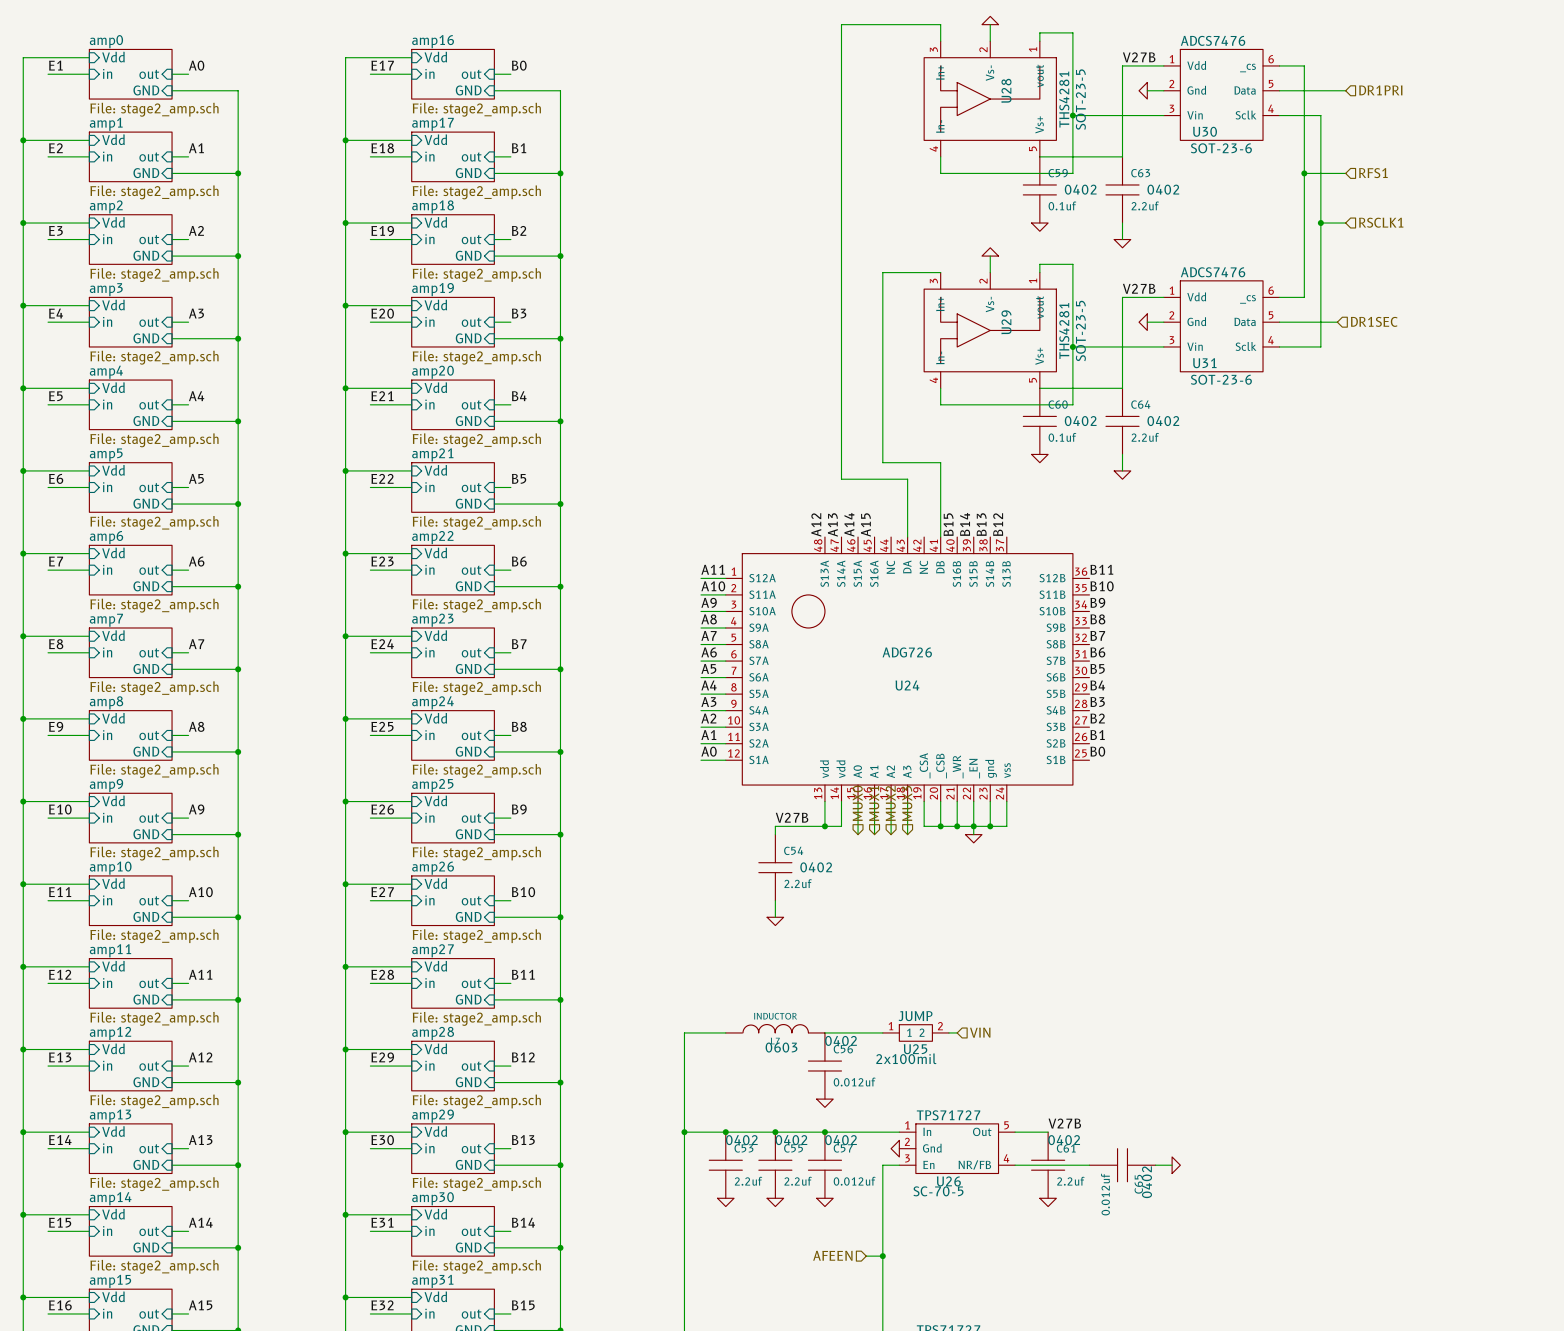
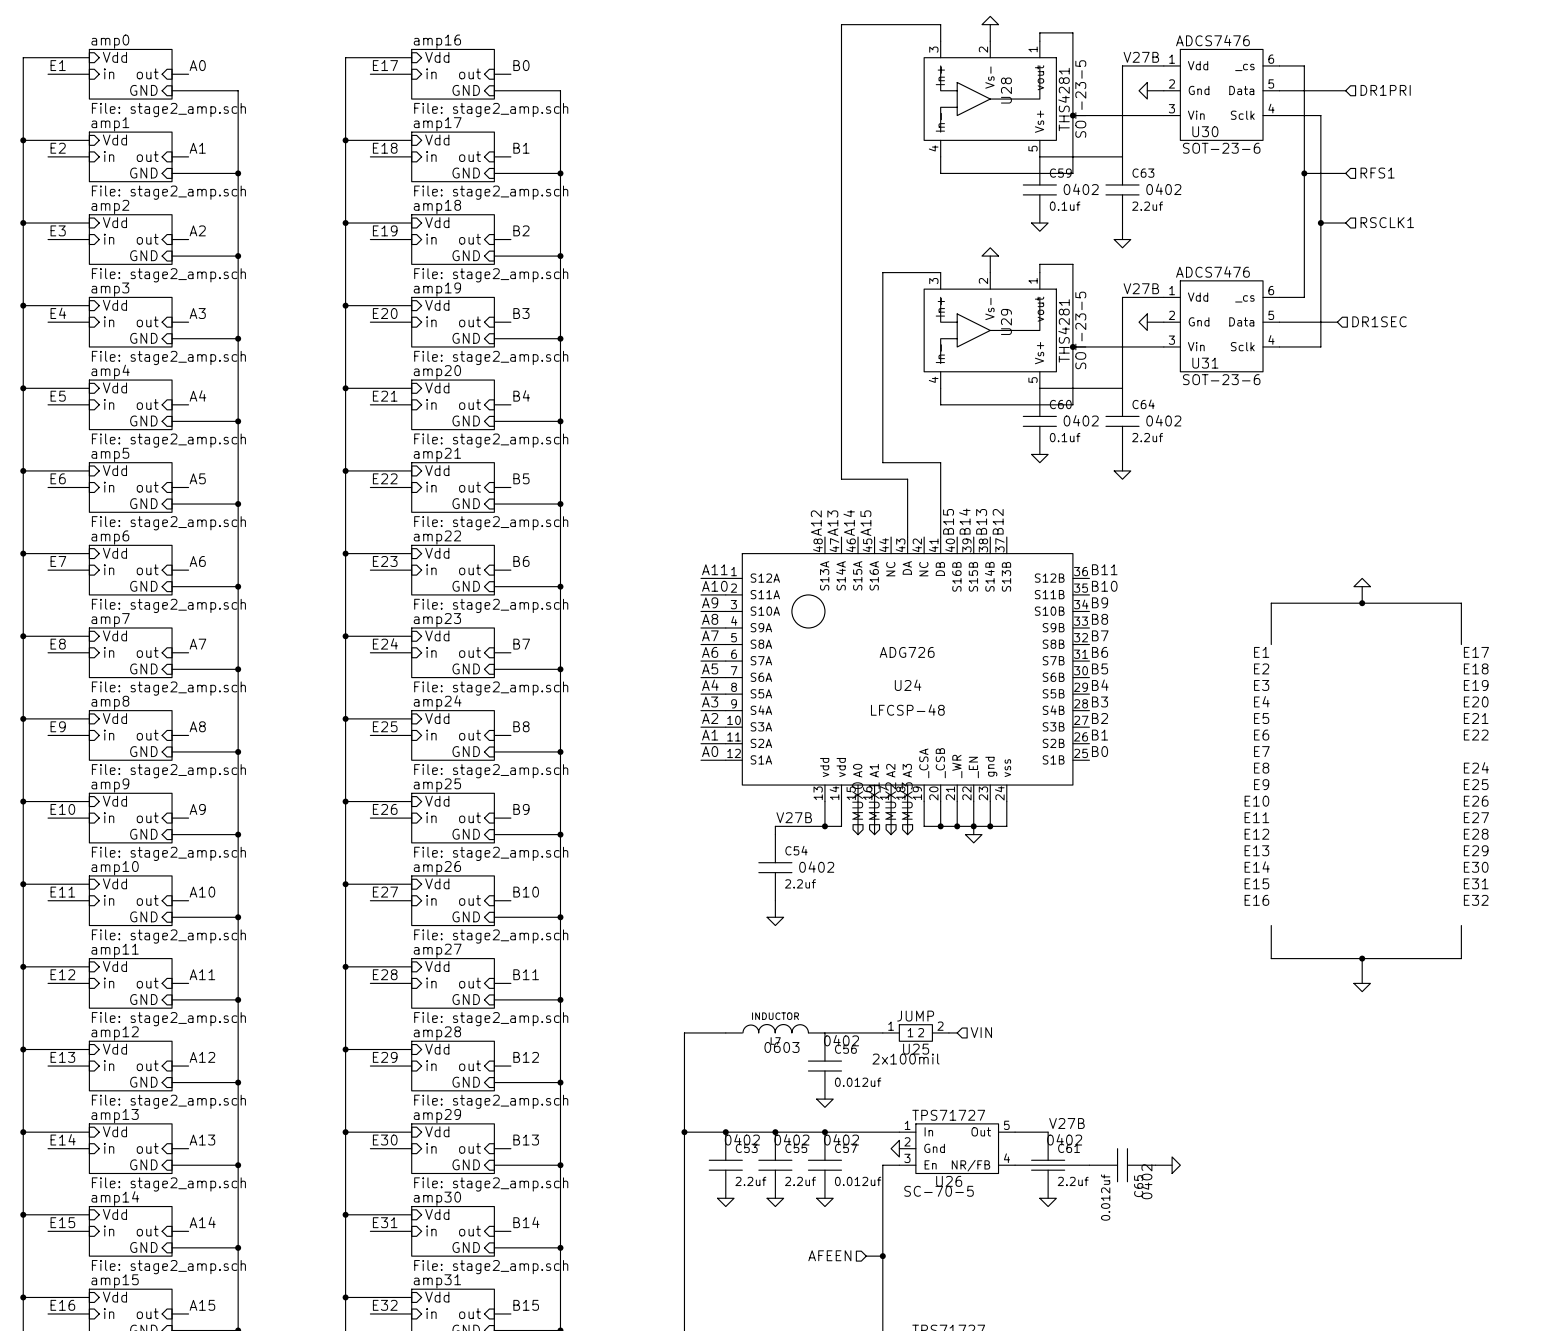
power symbol: none -> (1362, 582)
wire: none -> (1362, 586) (1362, 603)
junction: none -> (1362, 603)
wire: none -> (1271, 644) (1271, 603) (1461, 603) (1461, 644)
label: none -> E1 (1261, 652)
label: none -> E17 (1476, 652)
label: none -> E2 (1261, 668)
label: none -> E18 (1476, 668)
label: none -> E3 (1261, 685)
label: none -> E19 (1476, 685)
label: none -> E4 (1261, 701)
label: none -> E20 (1476, 701)
U24 text: none -> LFCSP-48 (907, 710)
label: none -> E5 (1261, 718)
label: none -> E21 (1476, 718)
label: none -> E6 (1261, 735)
label: none -> E22 (1476, 735)
label: none -> E7 (1261, 751)
label: none -> E8 (1261, 768)
label: none -> E24 (1476, 767)
label: none -> E9 (1261, 784)
label: none -> E25 (1476, 784)
label: none -> E10 (1256, 801)
label: none -> E26 (1476, 801)
label: none -> E11 (1256, 817)
label: none -> E27 (1476, 817)
label: none -> E12 (1256, 834)
label: none -> E28 (1476, 834)
label: none -> E13 (1256, 850)
label: none -> E29 (1476, 850)
label: none -> E14 (1257, 867)
label: none -> E30 (1476, 867)
label: none -> E15 (1256, 883)
label: none -> E31 (1476, 883)
label: none -> E16 (1256, 900)
label: none -> E32 (1476, 900)
wire: none -> (1271, 925) (1271, 958) (1461, 958) (1461, 925)
wire: none -> (1362, 958) (1362, 983)
junction: none -> (1362, 958)
power symbol: none -> (1362, 987)

